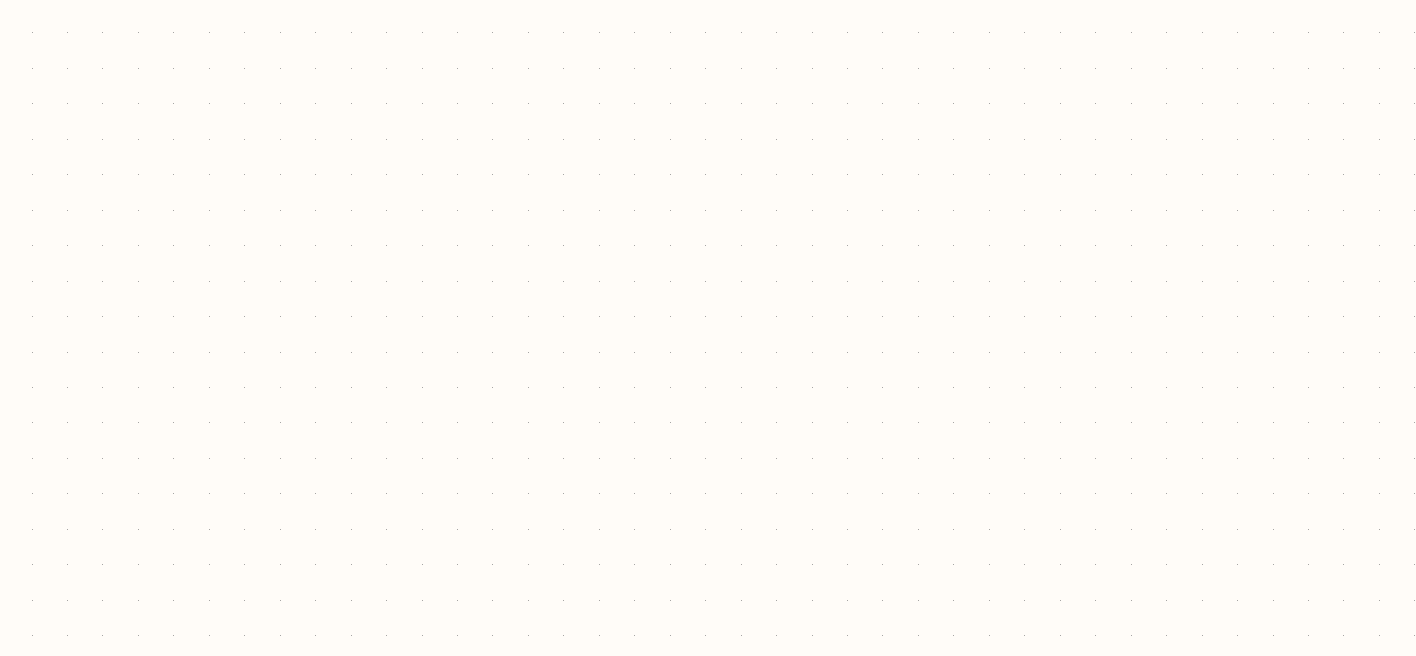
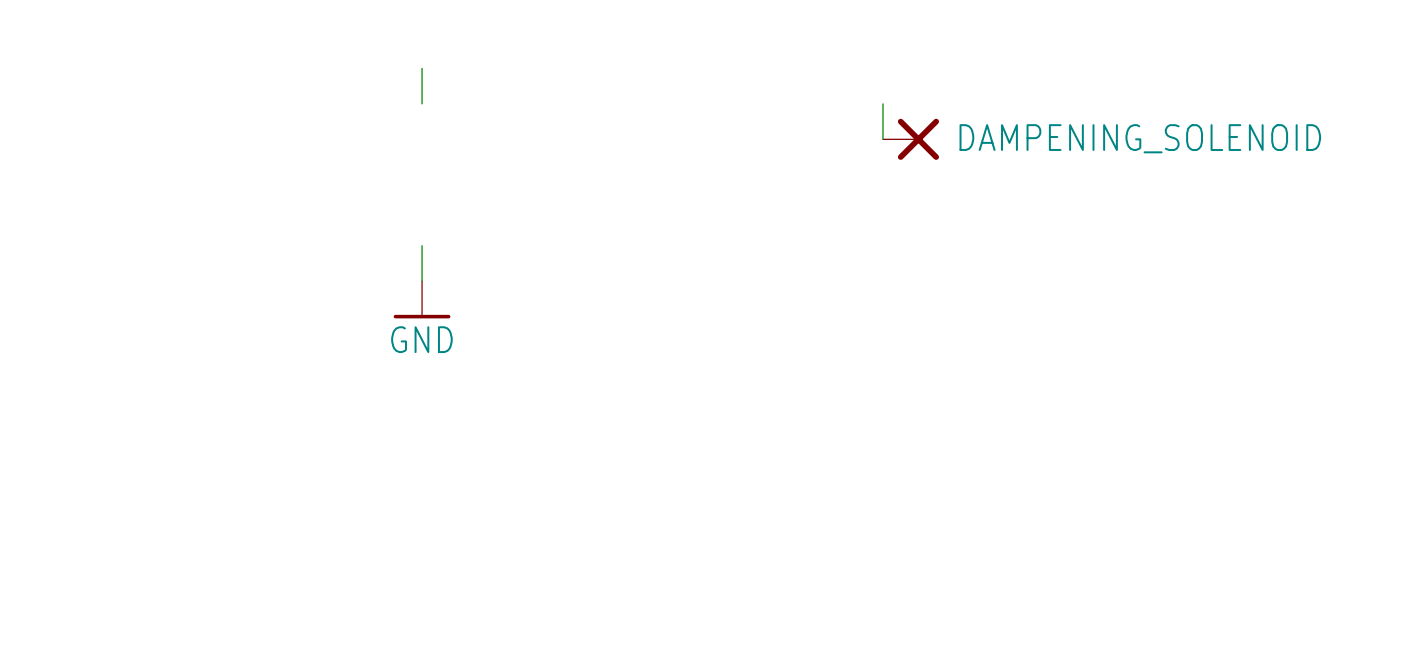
wire: none -> (422, 68) (422, 103)
wire: none -> (882, 103) (882, 139)
DAMPENING_SOLENOID: none -> (911, 139)
wire: none -> (422, 245) (422, 281)
power symbol: none -> GND (422, 299)

